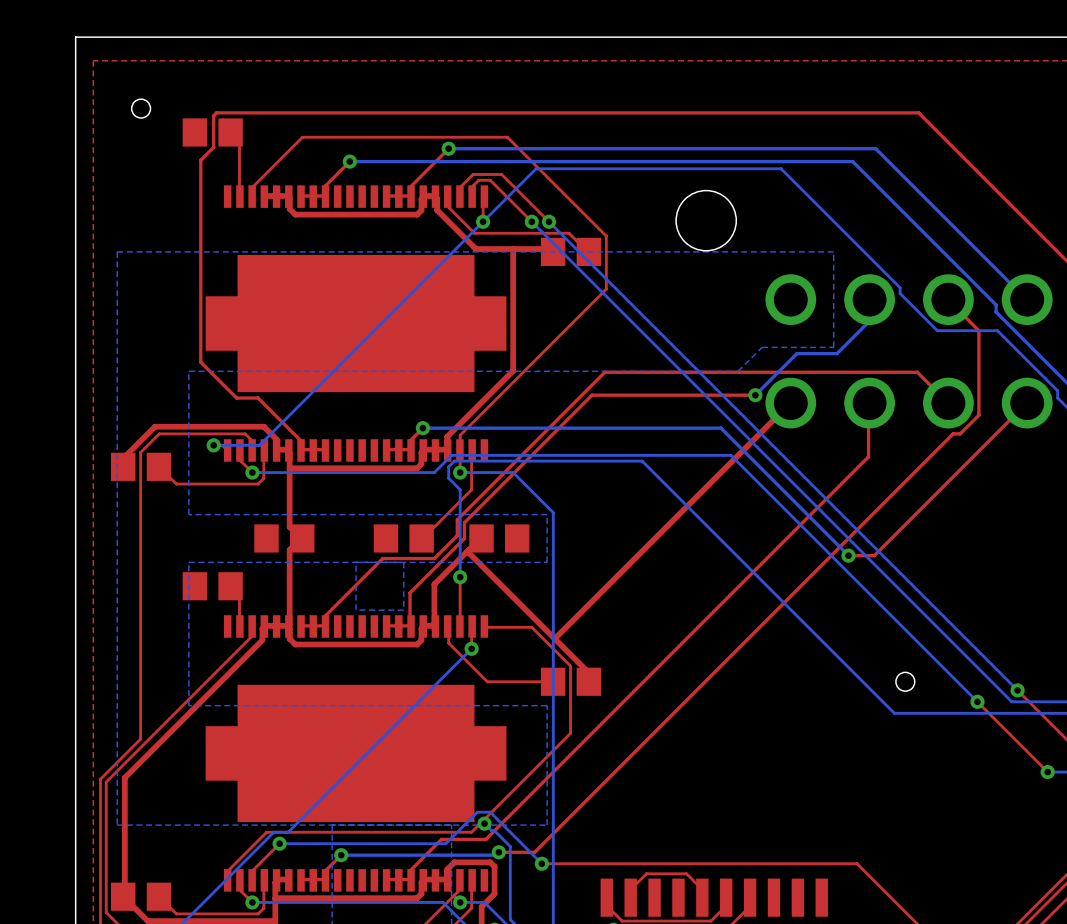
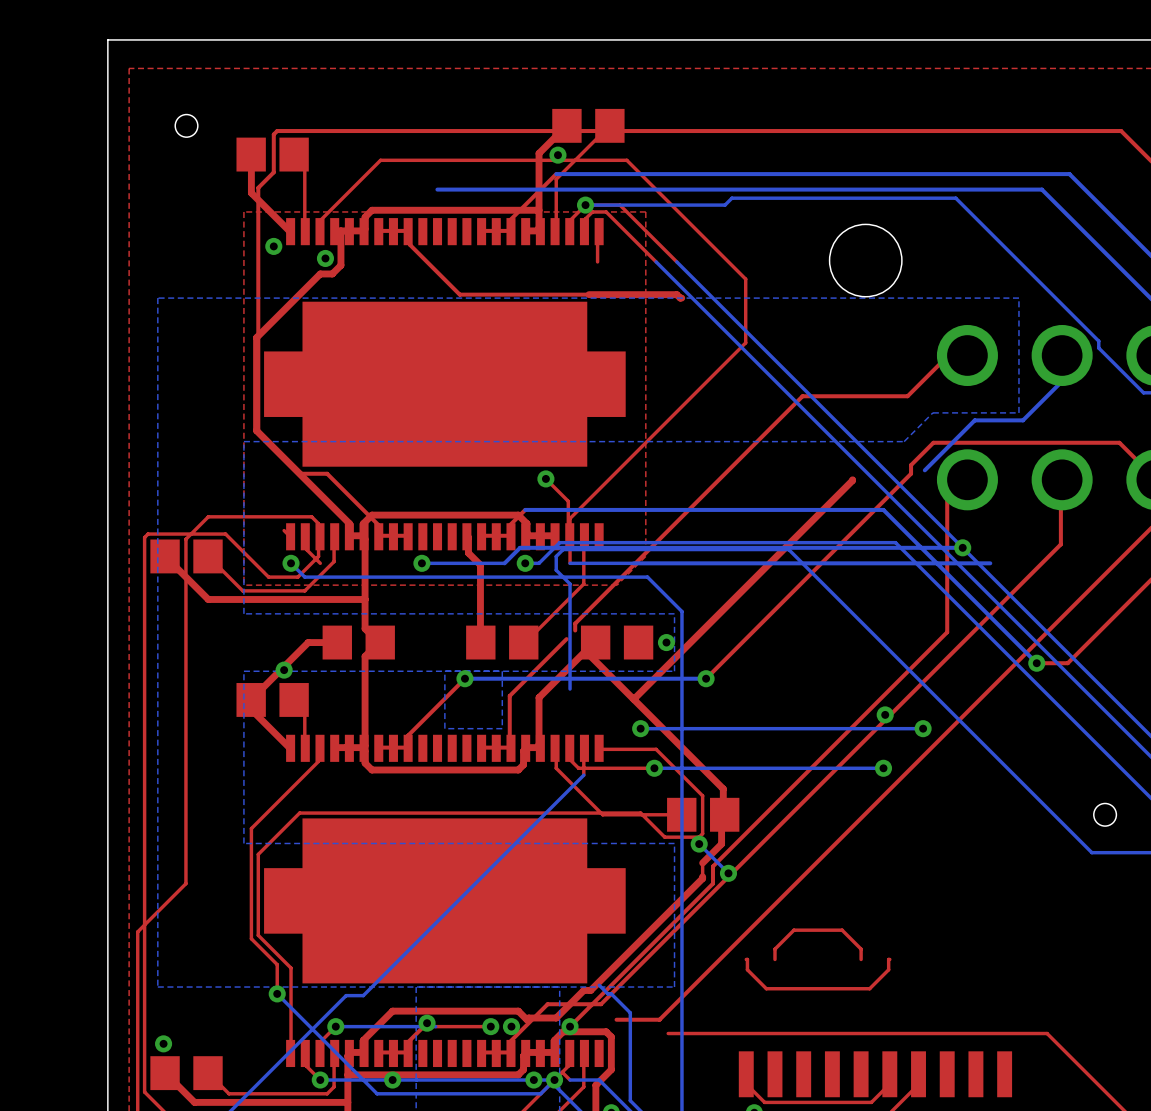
top track: none -> (566, 125) (539, 153) (540, 231)
top track: none -> (251, 154) (251, 193) (290, 231)
via position: (448, 148) -> (557, 155)
top track: (349, 161) (325, 185) (325, 196) -> none
via: (349, 161) -> none
bottom track: (594, 168) (536, 168) (259, 445) (213, 445) -> (731, 198) (725, 205) (585, 205)
via: none -> (585, 205)
top zone outline: none -> (645, 211) (243, 211) (243, 585) (617, 585) (645, 556) (645, 211)
top track: none -> (340, 230) (340, 265) (332, 273) (320, 273) (256, 337) (256, 430) (334, 508)
top track: (423, 196) (421, 210) (417, 214) (295, 214) (289, 208) (288, 196) -> (539, 210) (371, 210) (365, 217) (364, 231)
top track: (435, 196) (437, 210) (475, 249) -> (408, 231) (409, 232) (409, 244) (459, 294) (588, 294)
top track: (447, 196) (448, 207) (474, 233) (569, 233) (588, 251) -> (555, 231) (556, 179) (609, 125)
via: none -> (273, 246)
via: none -> (325, 258)
via: (483, 221) -> none
via: (531, 221) -> none
via: (549, 221) -> none
top track: (513, 249) (513, 370) (447, 436) (447, 450) -> none
part position: (570, 251) -> (588, 125)
top track: (762, 372) (604, 372) (457, 519) (457, 535) -> (933, 442) (911, 465) (911, 473) (706, 678)
top track: (755, 395) (592, 395) -> (947, 355) (907, 396) (802, 396) (728, 470)
via position: (755, 395) -> (962, 547)
top track: none -> (545, 478) (568, 501) (569, 536)
via: none -> (545, 478)
top track: none -> (852, 479) (633, 699)
top track: none -> (947, 479) (947, 632) (712, 866) (712, 883) (570, 1026)
top track: (790, 403) (554, 638) -> none
top track: (263, 426) (154, 426) (123, 458) (123, 466) -> (365, 599) (208, 599) (165, 556)
via: (422, 428) -> none
via: (213, 445) -> none
top track: none -> (466, 536) (468, 552) (480, 565) (480, 642)
top track: (423, 450) (421, 452) (421, 463) (417, 468) (289, 468) -> (525, 536) (526, 523) (518, 515) (371, 515) (363, 523) (364, 536)
top track: (263, 471) (263, 478) (258, 484) (233, 484) -> (319, 536) (318, 556) (297, 577)
via: none -> (291, 563)
via: (252, 472) -> none
bottom track: (336, 472) (252, 472) -> none
via: none -> (421, 563)
bottom track: (422, 472) (405, 472) -> (962, 547) (520, 547) (504, 563)
via: none -> (525, 563)
via: (460, 472) -> none
bottom track: (513, 472) (524, 484) -> (291, 563) (304, 577) (647, 577)
bottom track: none -> (990, 563) (633, 563)
top track: (209, 484) (176, 484) -> (334, 561) (304, 590) (242, 590) (229, 577)
top track: none -> (268, 577) (225, 534) (148, 534) (144, 537) (144, 935)
top track: (464, 528) (464, 538) (410, 592) -> (539, 666) (509, 695) (509, 708)
top track: none -> (337, 642) (308, 642) (251, 699) (251, 709) (290, 748)
via: none -> (666, 642)
top track: (467, 551) (587, 671) -> (595, 642) (587, 652) (723, 788) (723, 802)
top track: (434, 558) (382, 558) (372, 568) -> none
via: none -> (284, 670)
via: none -> (464, 678)
bottom track: none -> (706, 678) (464, 678)
via: none -> (706, 678)
top track: (460, 577) (459, 626) -> (654, 768) (578, 768) (570, 759) (569, 748)
via: (460, 577) -> none
via: none -> (885, 714)
via: none -> (640, 728)
bottom track: none -> (923, 728) (640, 728)
via: none -> (923, 728)
top track: (264, 626) (262, 628) (262, 640) (124, 777) (124, 895) (123, 896) -> none
via: none -> (654, 768)
bottom track: none -> (883, 768) (654, 768)
via: none -> (883, 768)
via: (471, 648) -> none
top track: (195, 693) (106, 782) -> (251, 828) (251, 938) (277, 964) (277, 993)
top track: (570, 697) (570, 721) -> (724, 814) (721, 816) (721, 844) (702, 863)
bottom track: none -> (699, 844) (728, 873)
via: none -> (699, 844)
via: none -> (728, 873)
top track: (570, 733) (471, 832) (266, 832) (228, 870) -> (702, 833) (699, 837) (664, 837) (640, 813) (299, 813) (258, 854) (258, 935) (291, 968) (291, 1042)
top track: none -> (702, 876) (590, 990) (583, 990) (556, 1018) (528, 1018) (526, 1019) (518, 1011) (392, 1011) (363, 1040) (364, 1053)
top track: none -> (861, 959) (861, 949) (842, 930) (793, 930) (774, 949) (774, 959)
top track: none -> (889, 959) (888, 969) (869, 988) (766, 988) (747, 969) (746, 959)
via: (484, 823) -> none
bottom track: none -> (277, 993) (377, 1093) (540, 1093) (554, 1080)
via: none -> (277, 993)
top track: (279, 843) (265, 858) -> none
bottom track: (279, 843) (445, 843) (477, 812) (490, 812) (541, 863) -> none
via position: (279, 843) -> (335, 1026)
bottom track: (498, 852) (495, 855) (341, 855) -> none
via: (498, 852) -> none
bottom track: none -> (435, 1026) (335, 1026)
top track: none -> (490, 1026) (435, 1026)
via: none -> (490, 1026)
via: none -> (511, 1026)
via: none -> (570, 1026)
via: (541, 863) -> none
via: none -> (163, 1043)
top track: (702, 897) (702, 889) (686, 873) (646, 873) (630, 889) (630, 897) -> none
via: none -> (392, 1080)
via: none -> (533, 1080)
via position: (460, 902) -> (554, 1080)

